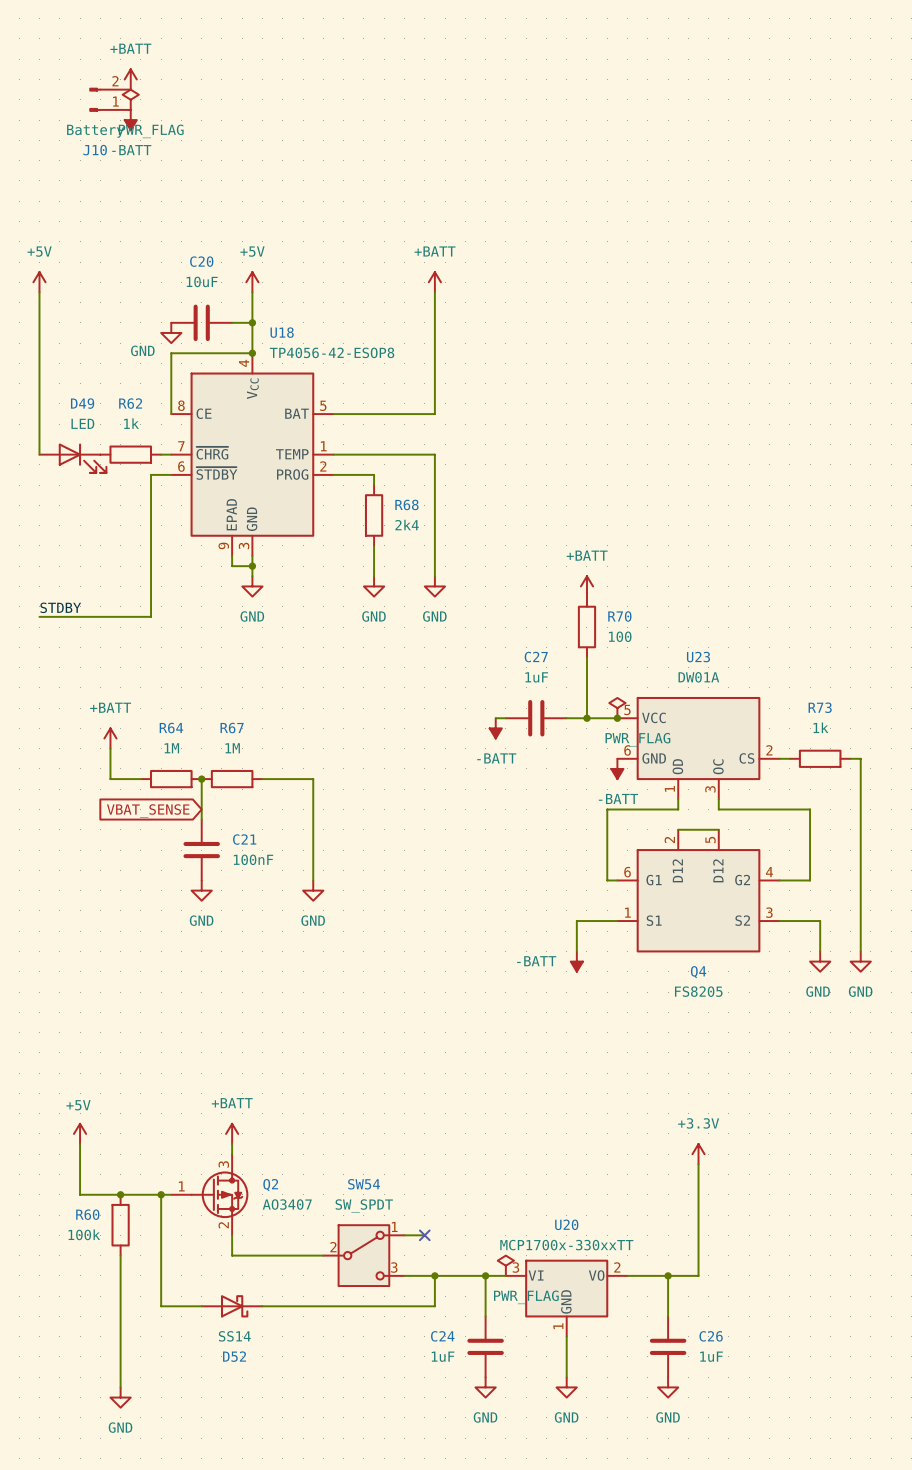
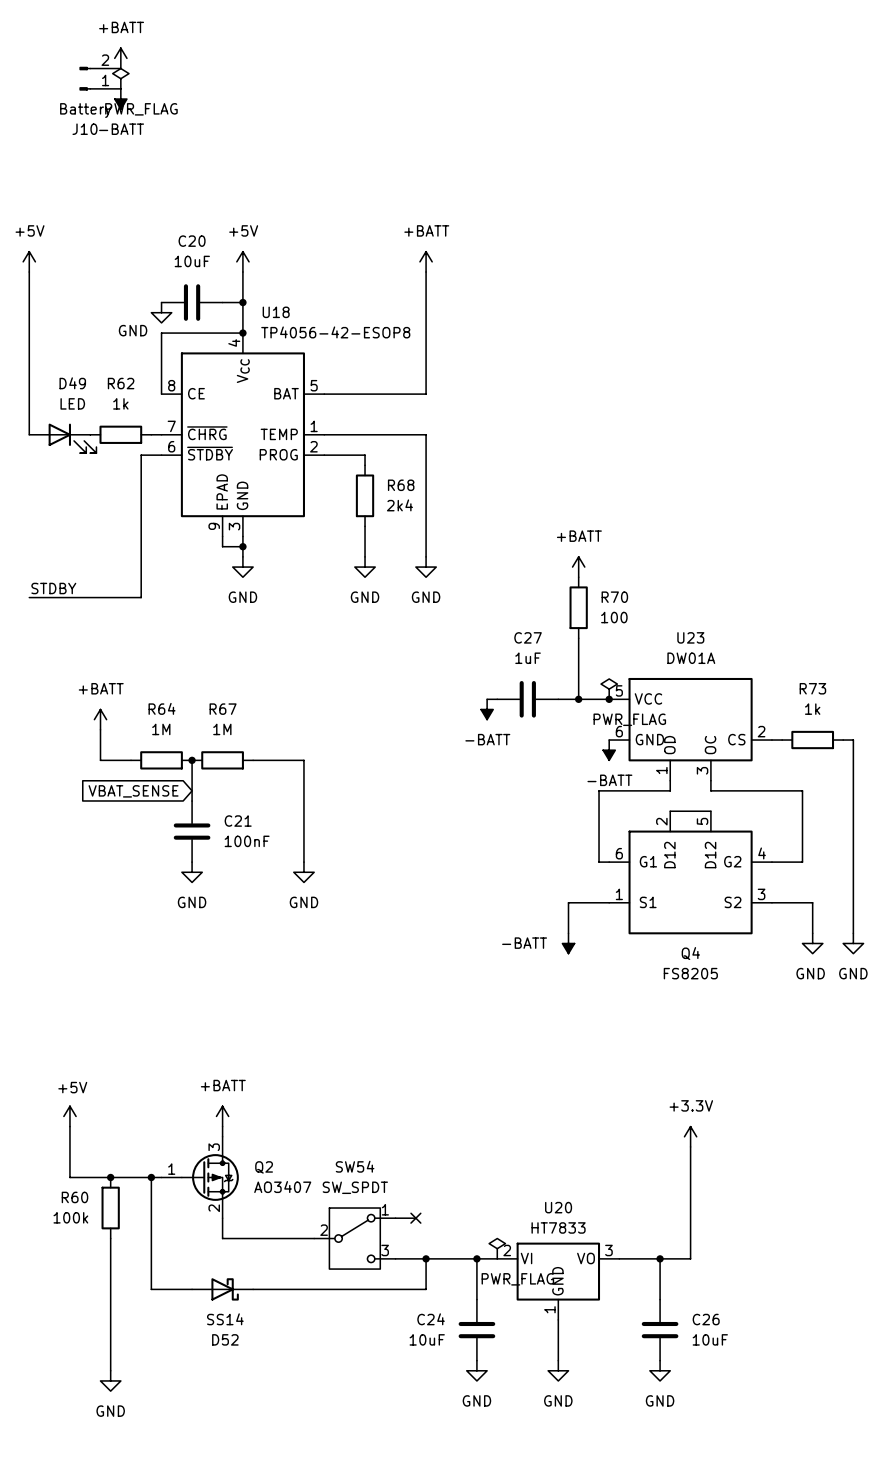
U20 value: MCP1700x-330xxTT (566, 1245) -> HT7833 (558, 1227)
U20 pin number: 3 (515, 1267) -> 2 (507, 1250)
U20 pin number: 2 (617, 1267) -> 3 (608, 1250)
C24 value: 1uF (443, 1356) -> 10uF (427, 1339)
C26 value: 1uF (711, 1356) -> 10uF (710, 1339)

